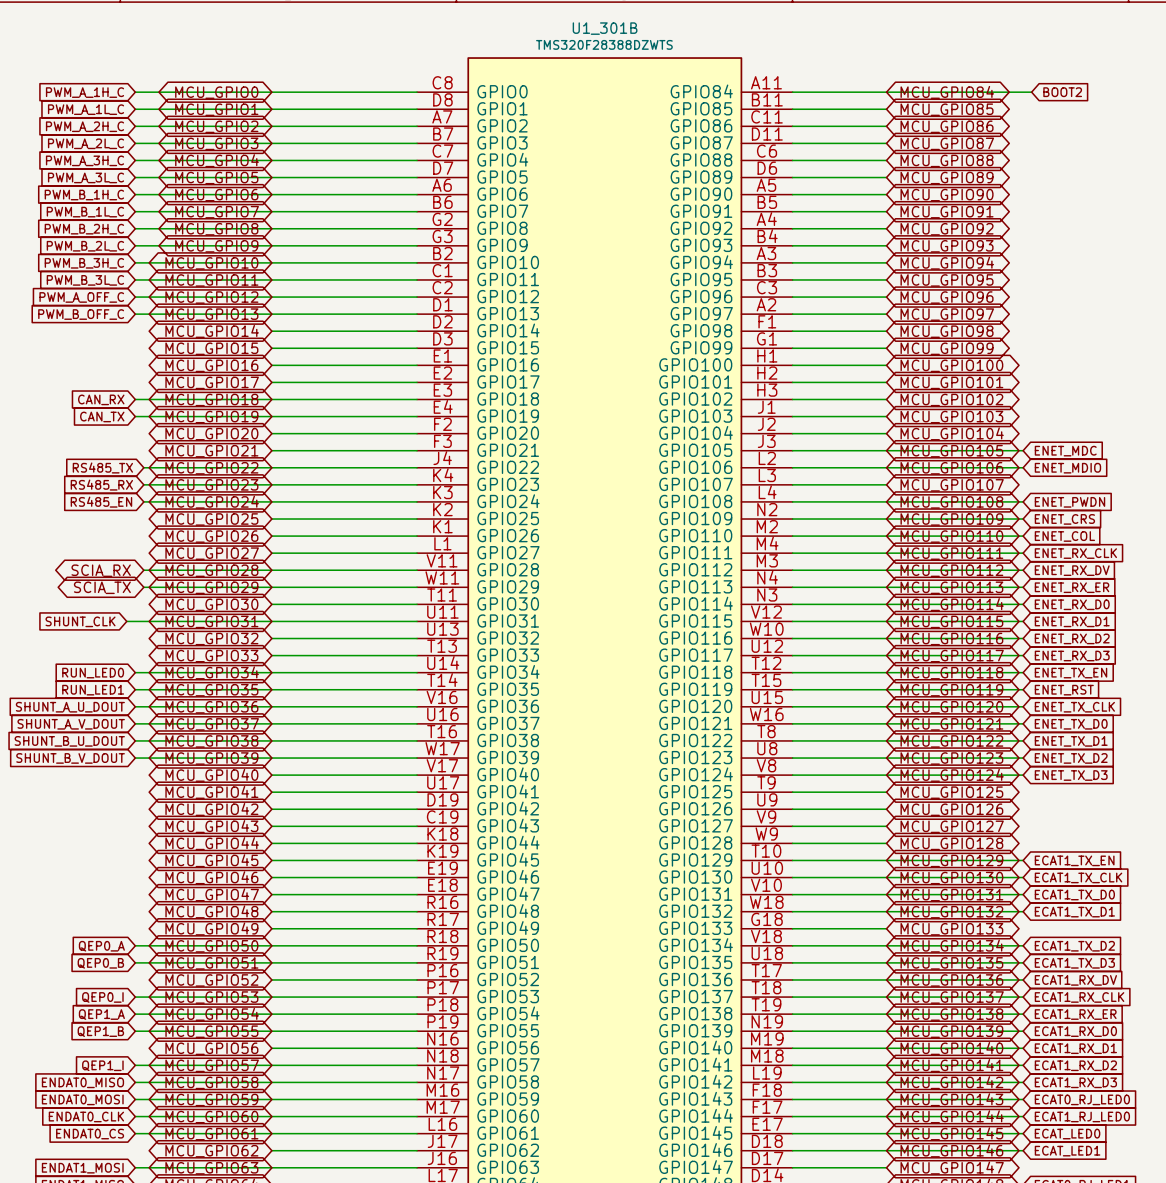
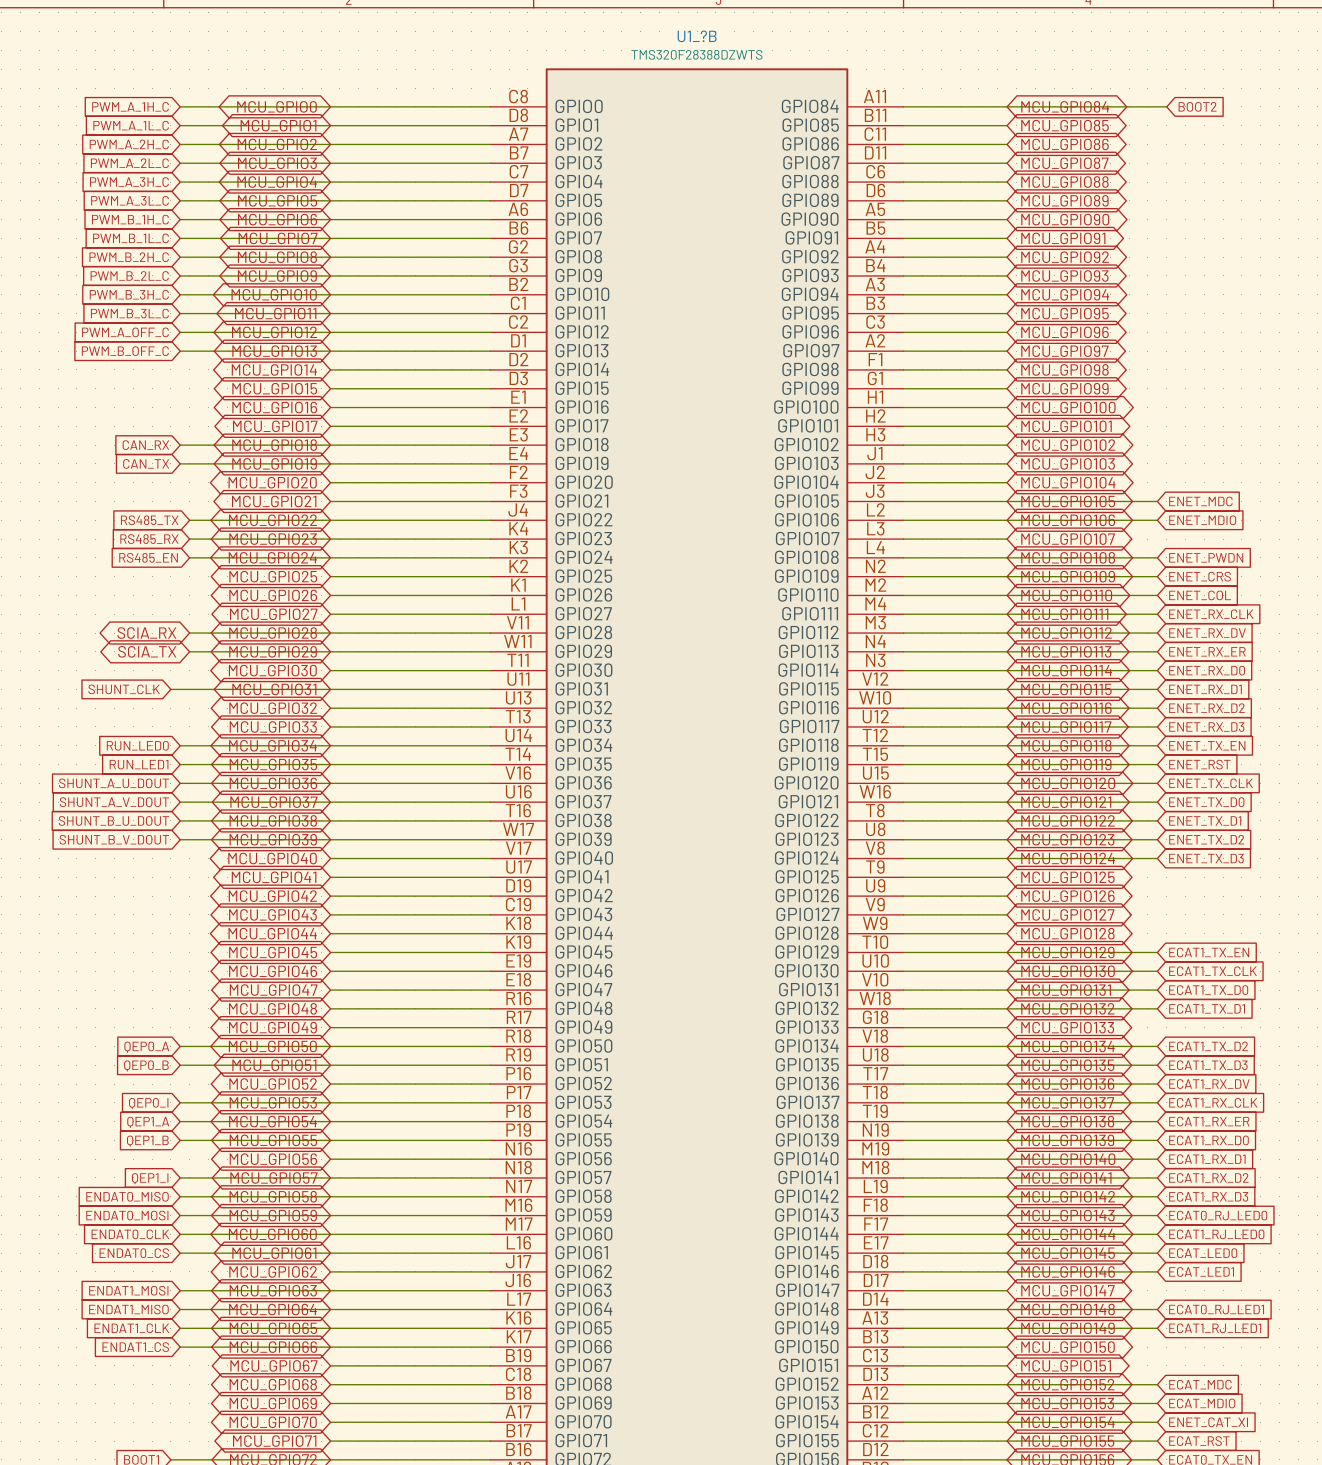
U1_301B name: U1_301B (605, 28) -> U1_?B (697, 36)

